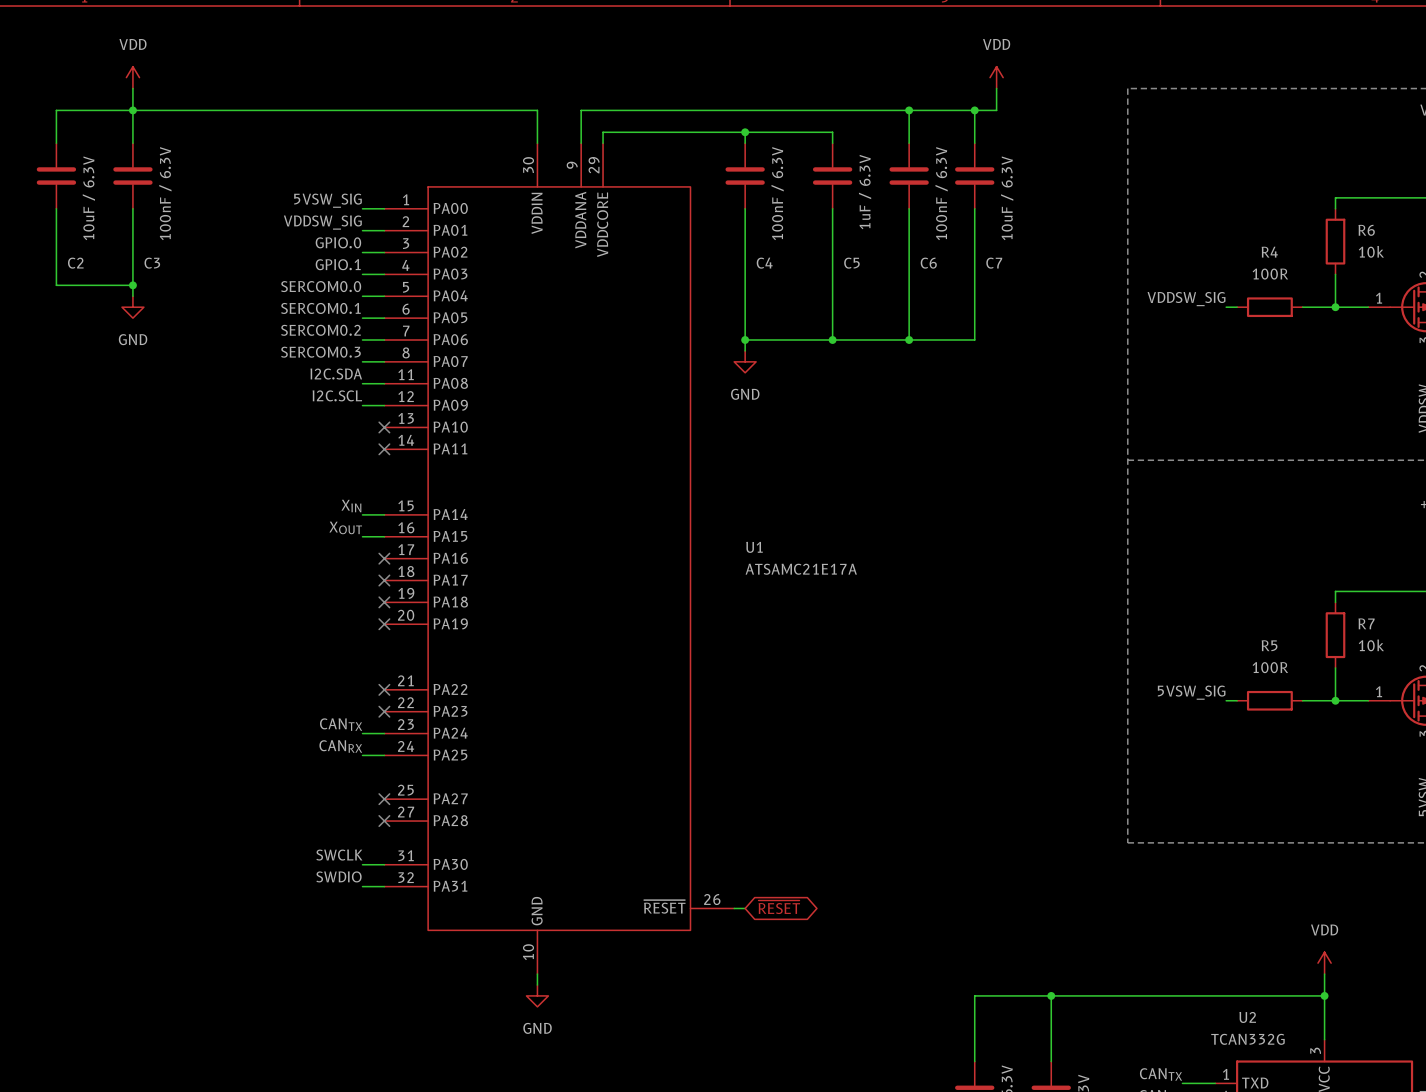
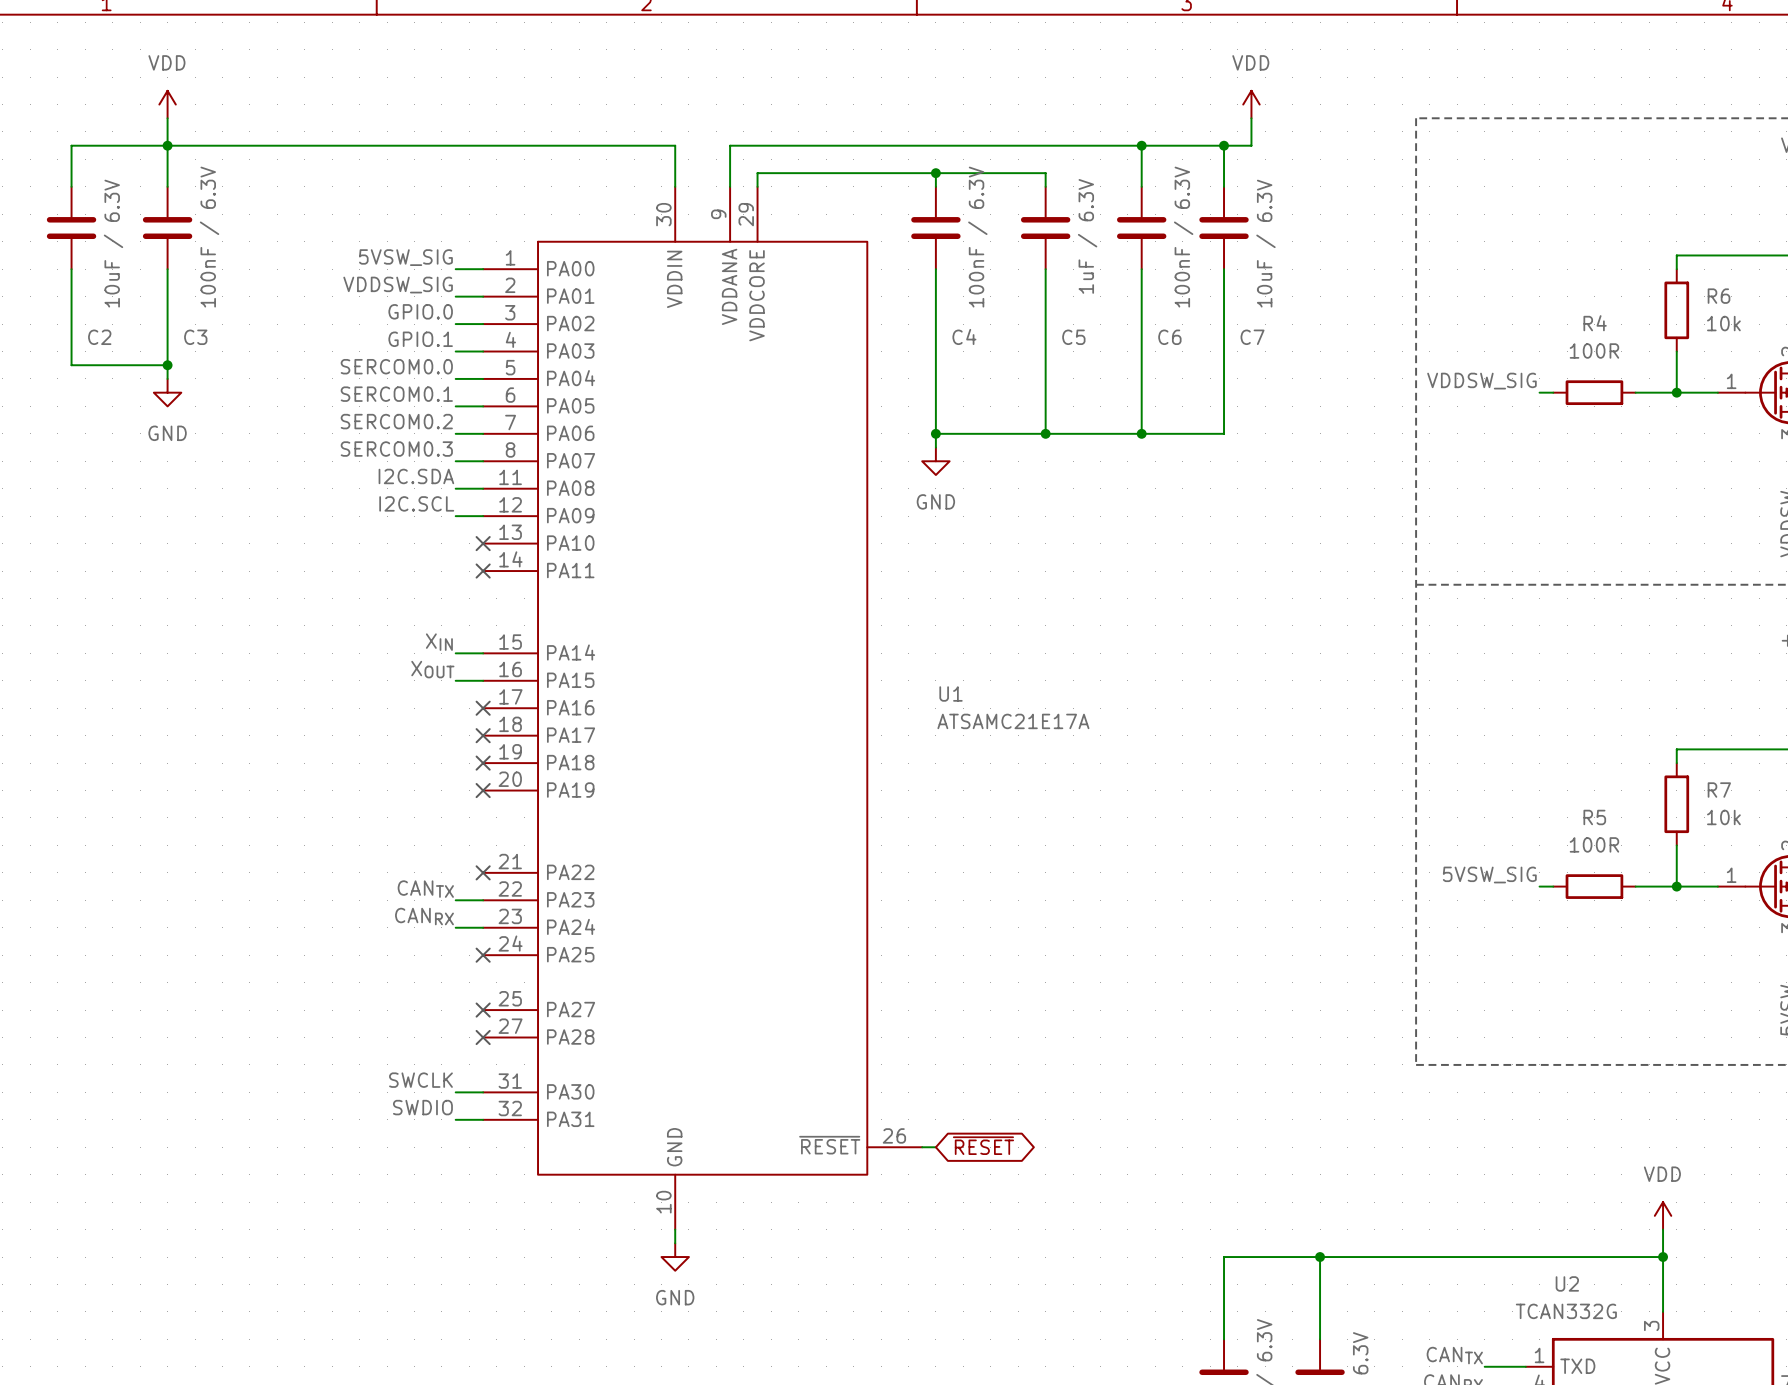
label: none -> CANTX (425, 889)
no-connect mark position: (384, 711) -> (483, 955)
label: CANTX (341, 724) -> CANRX (424, 916)
label: CANRX (340, 746) -> none
wire: (362, 755) (384, 755) -> (455, 900) (483, 900)

